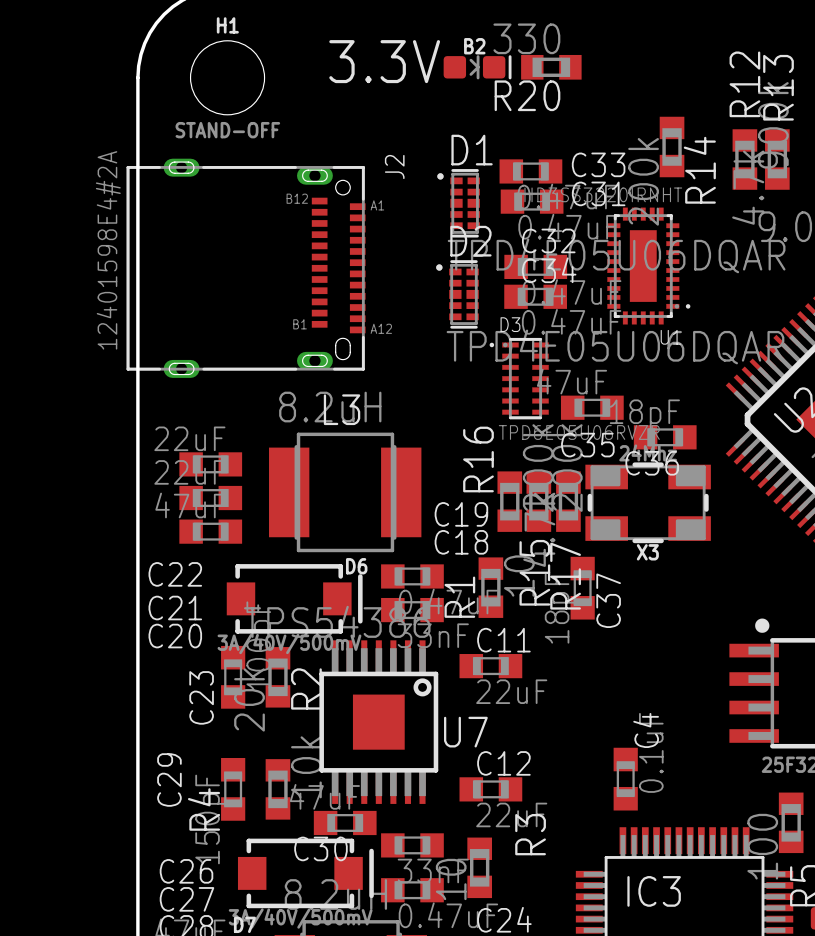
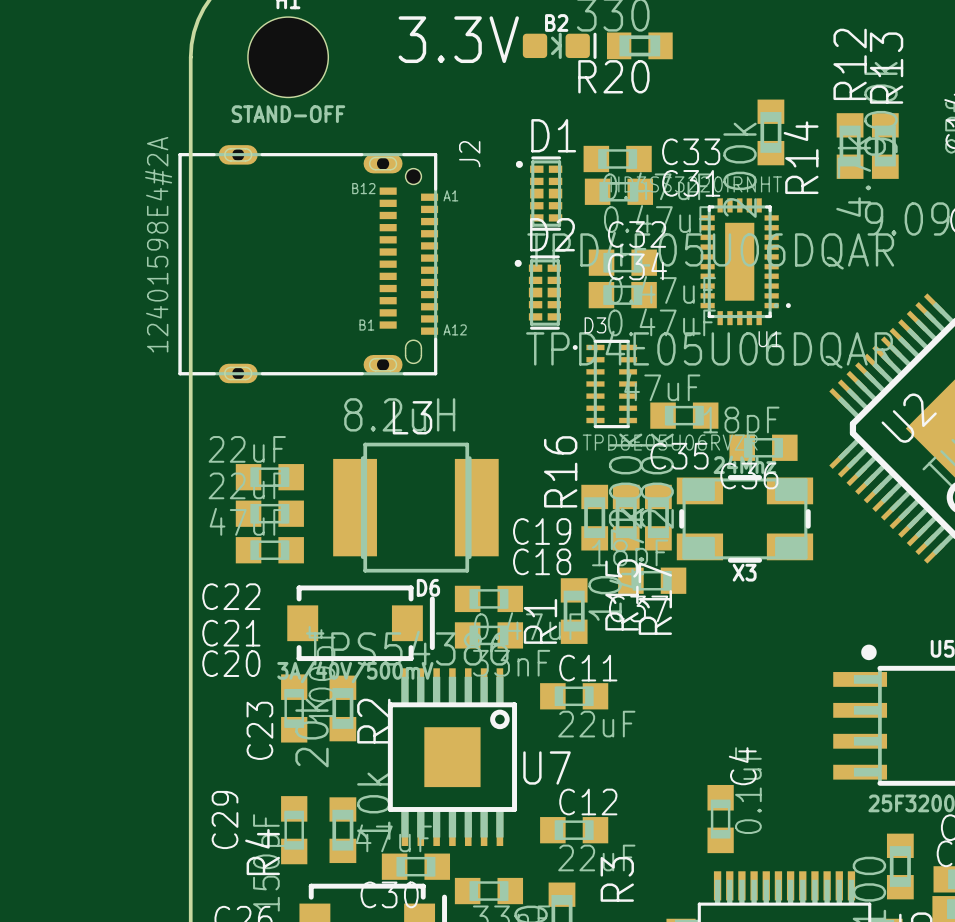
C37 rotation: 0° (582, 588) -> 90° clockwise (652, 580)

